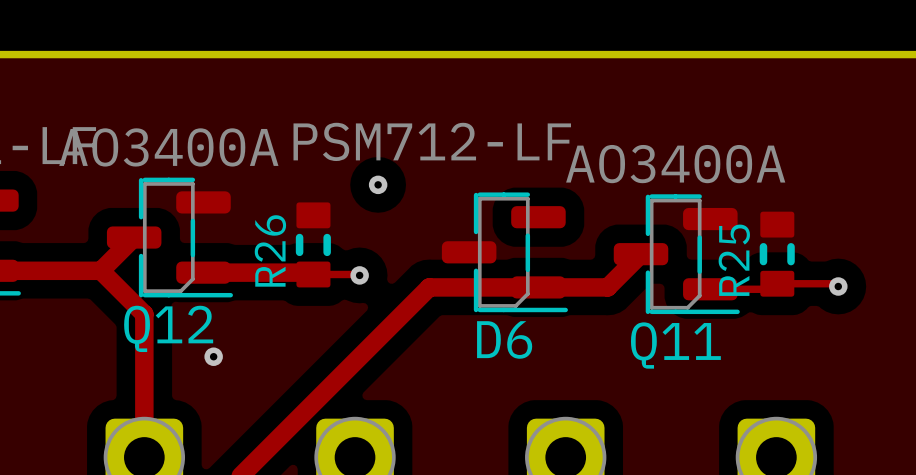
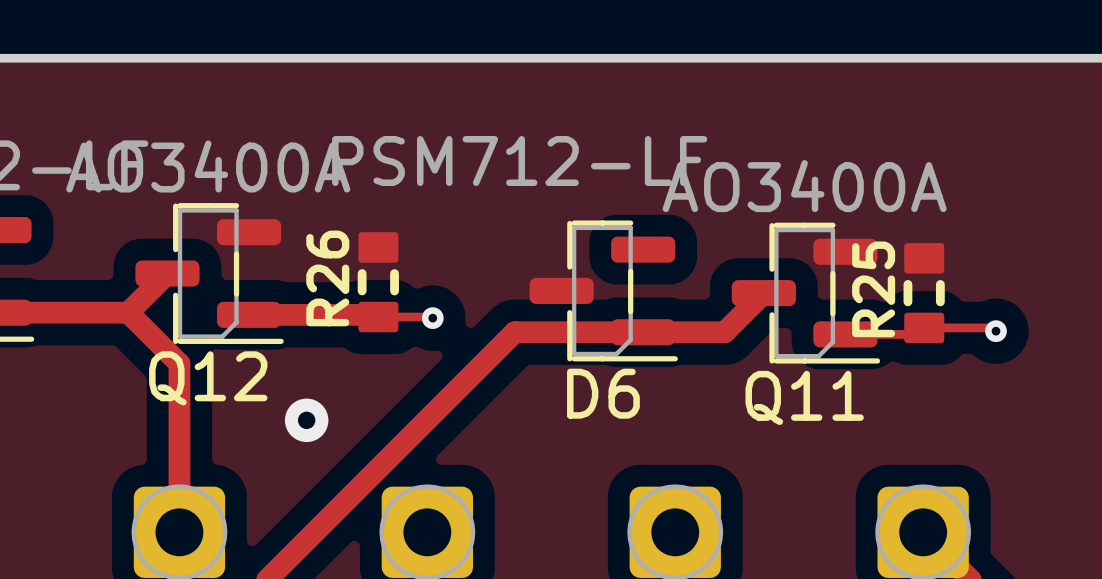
via: (378, 184) -> none
via: (213, 356) -> none
via: none -> (306, 420)

